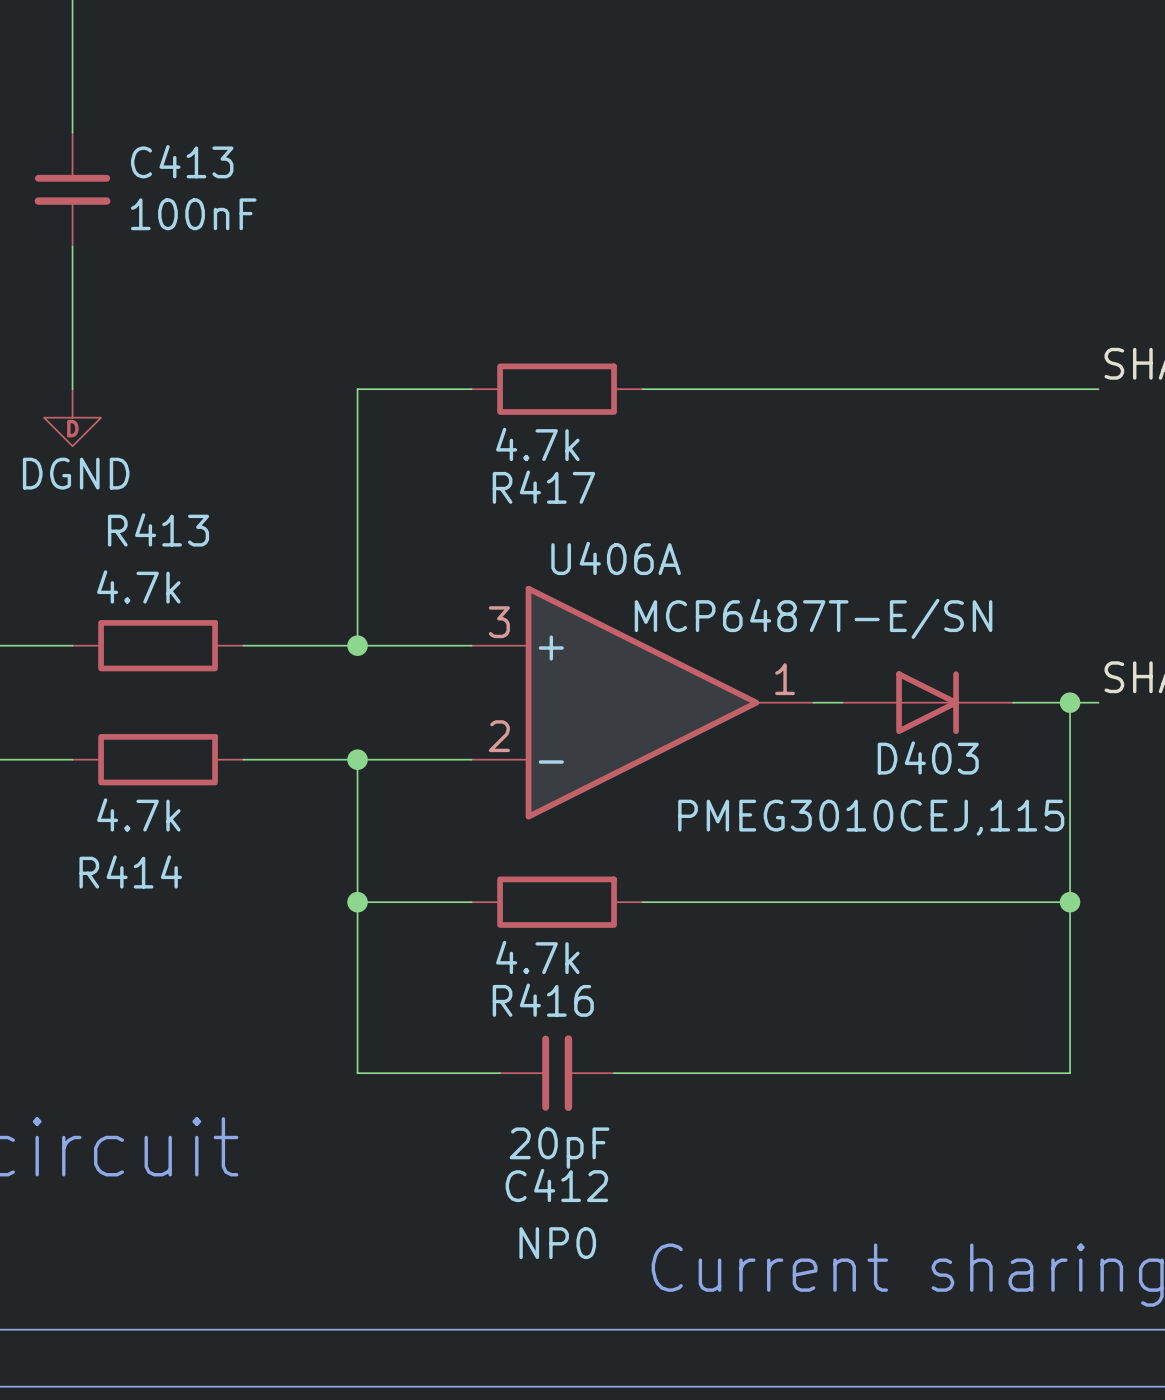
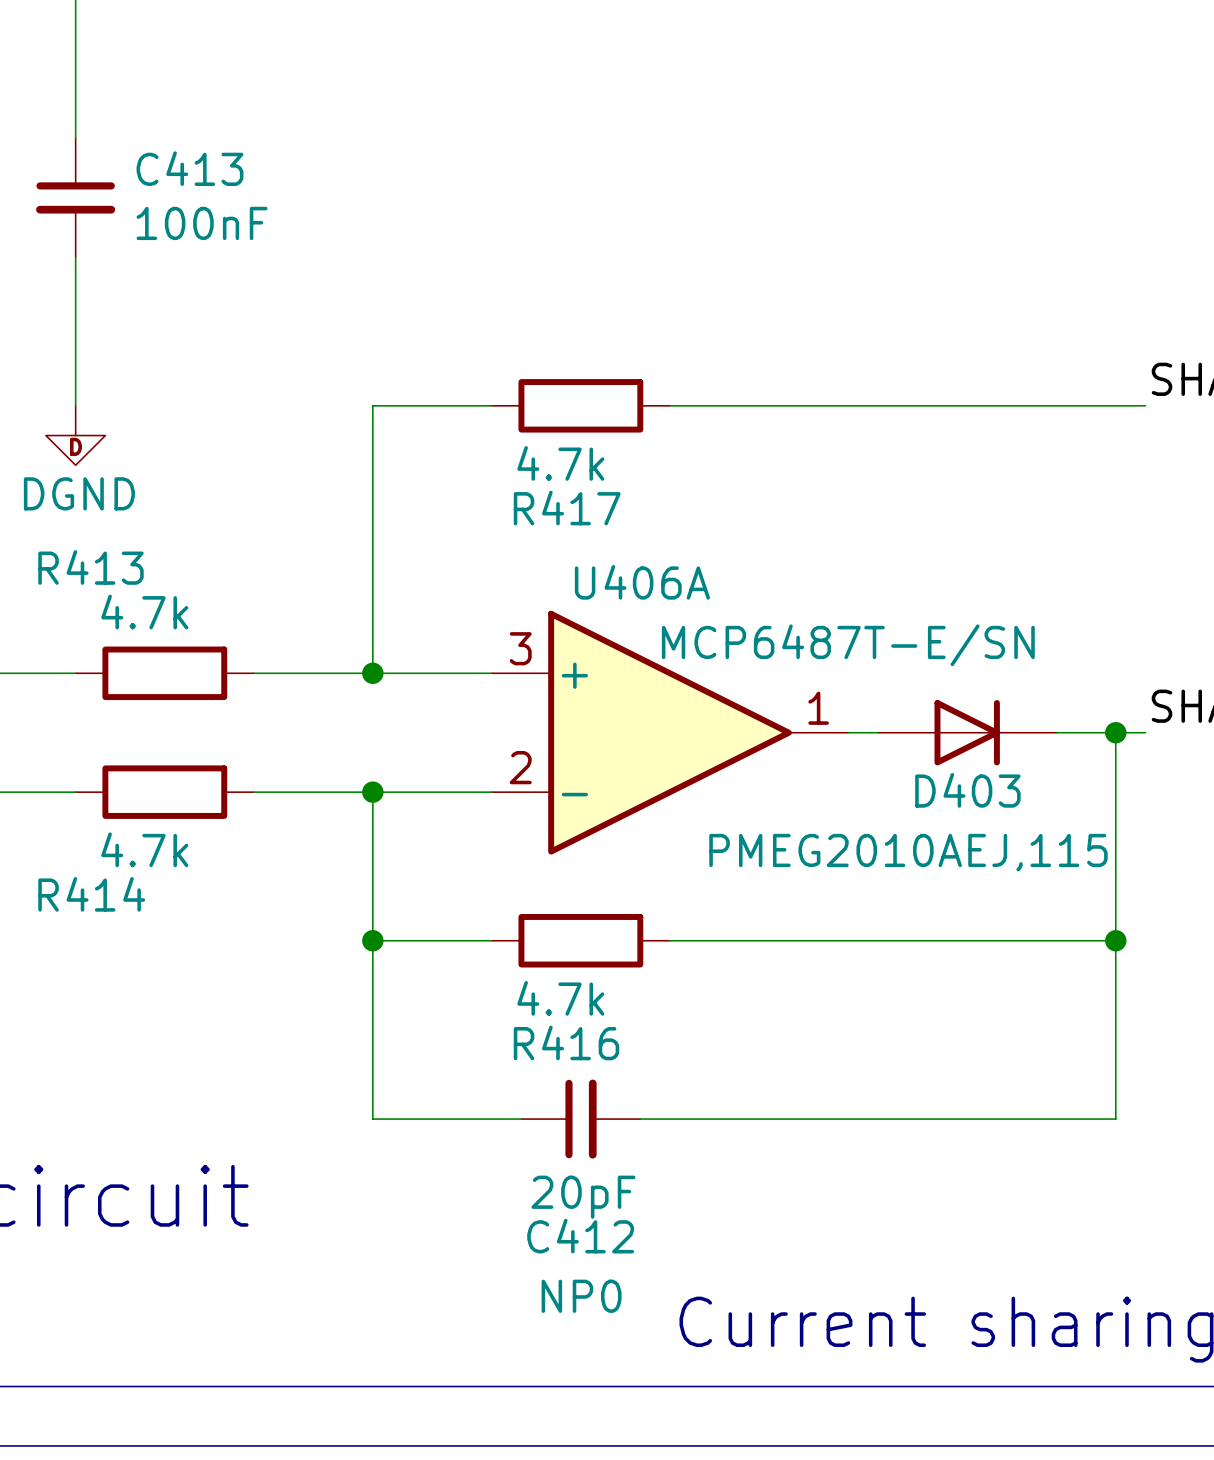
R413 name position: R413 (158, 529) -> R413 (90, 567)
D403 value: PMEG3010CEJ,115 (871, 817) -> PMEG2010AEJ,115 (908, 852)
R414 name position: R414 (130, 871) -> R414 (91, 894)

